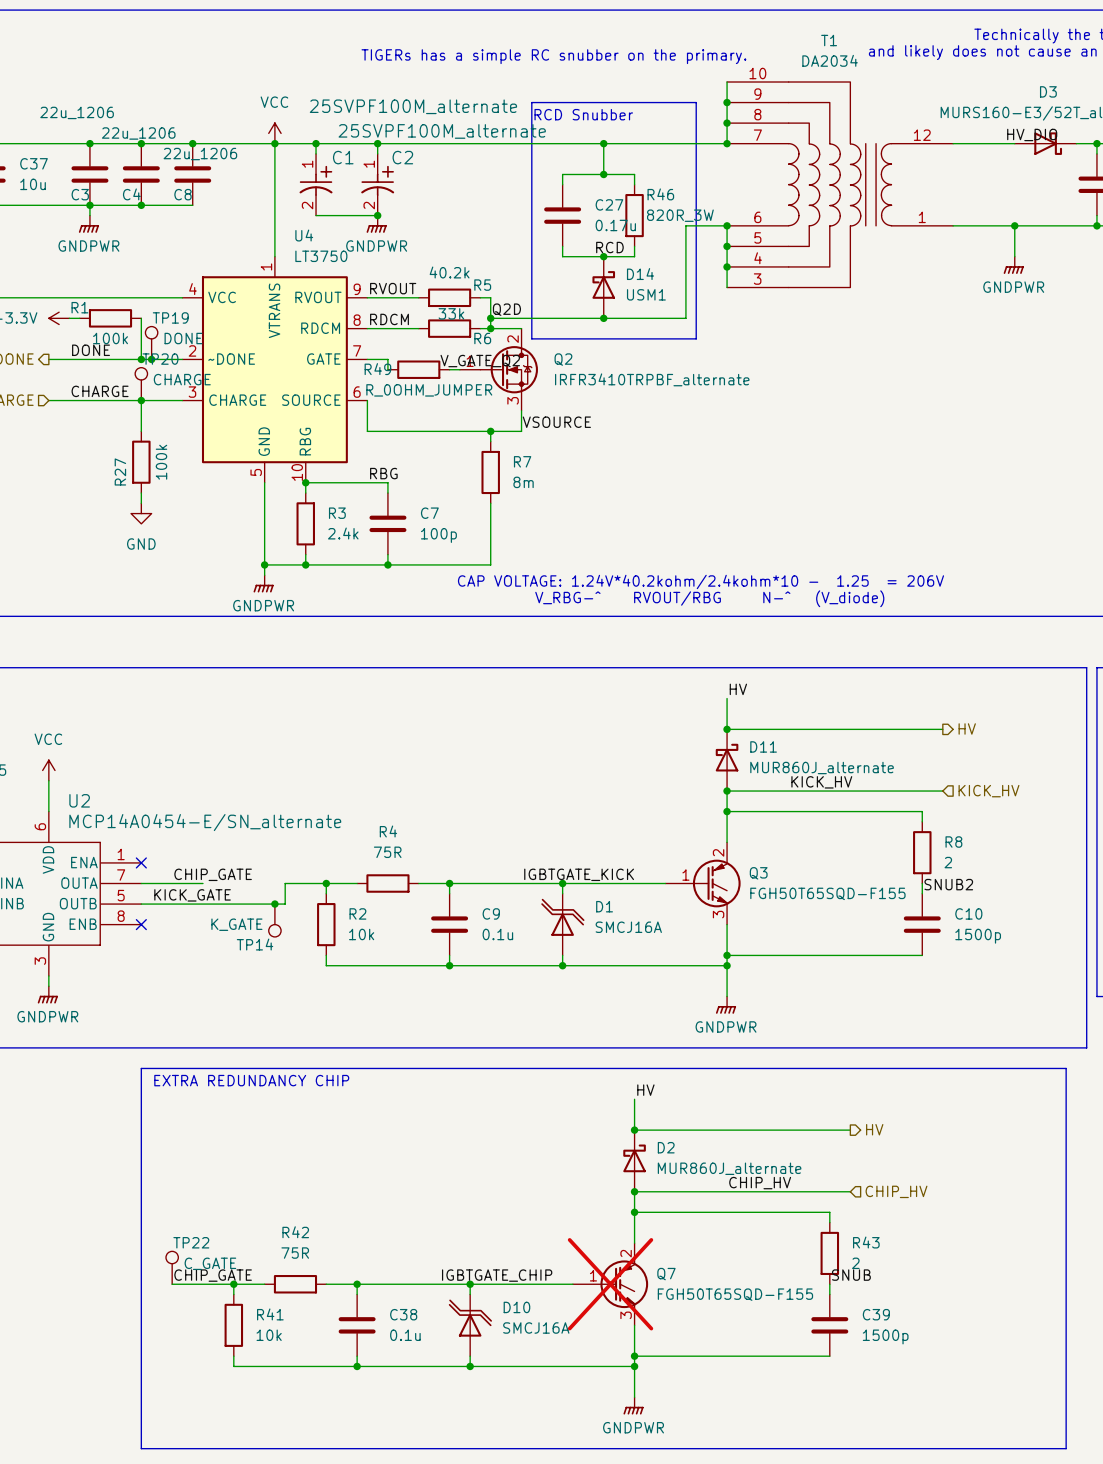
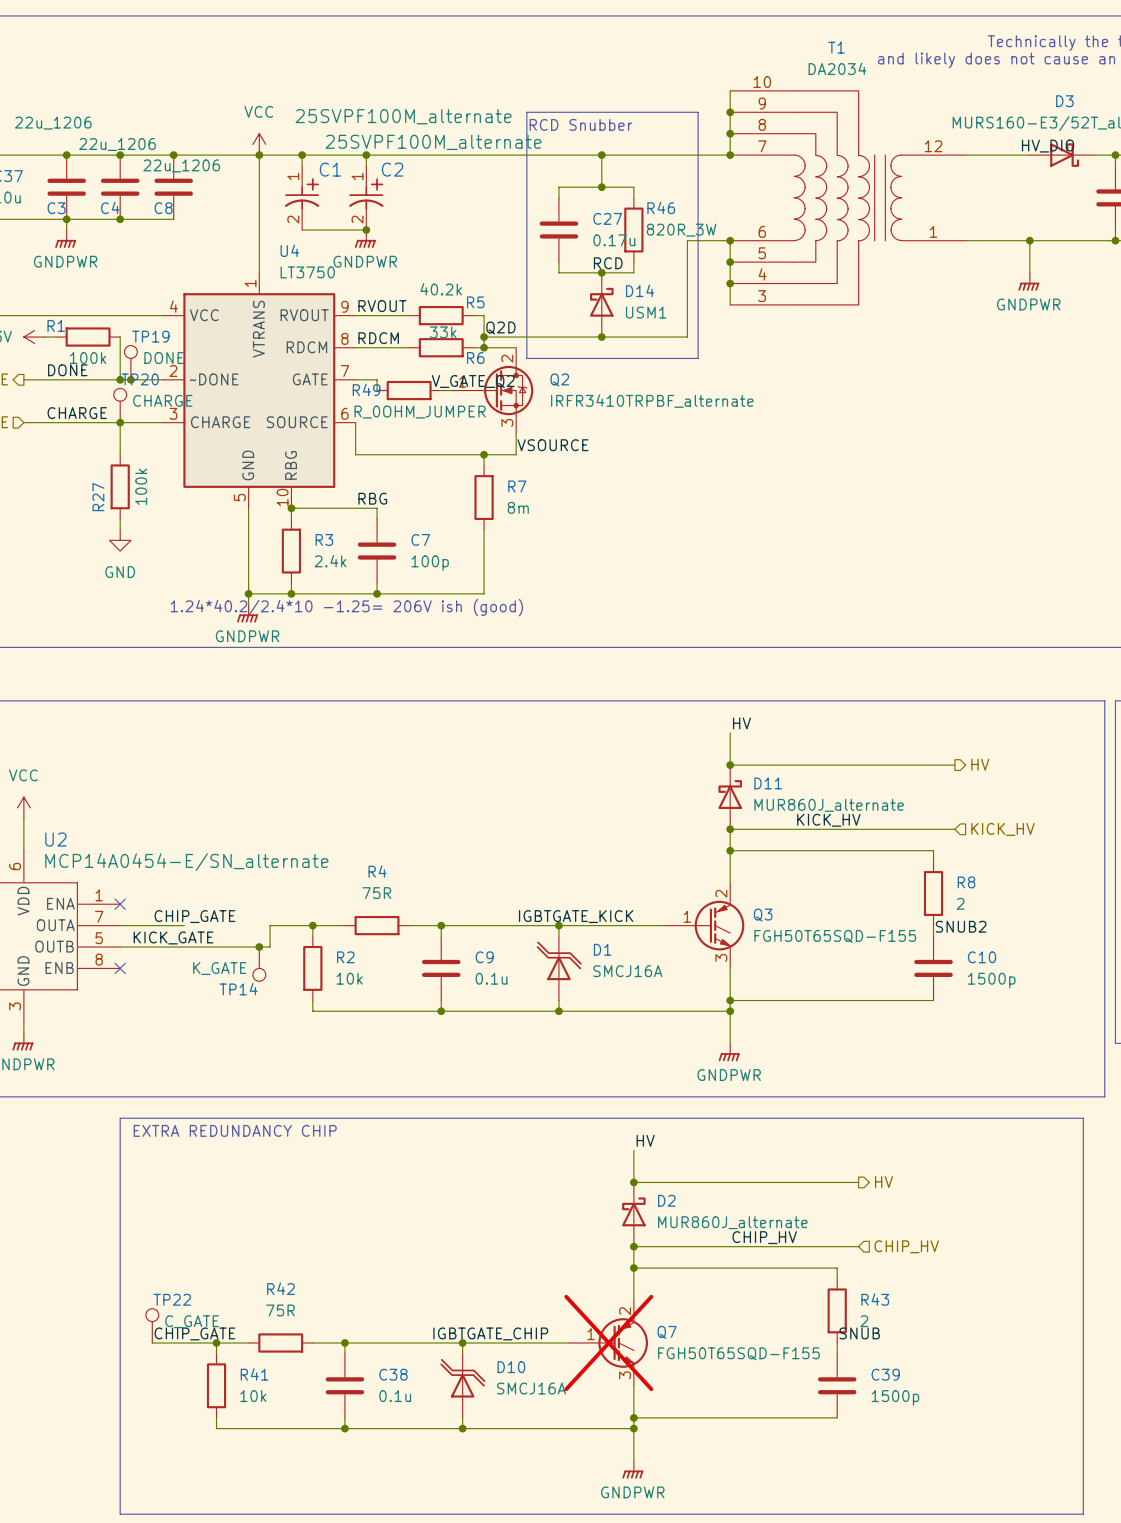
text: TIGERs has a simple RC snubber on the primary. (553, 56) -> none
text: CAP VOLTAGE: 1.24V*40.2kohm/2.4kohm*10 - 1.25 = 206V (700, 581) -> 1.24*40.2/2.4*10 -1.25= 206V ish (good) (346, 607)
text: V_RBG-^ RVOUT/RBG N-^ (V_diode) (709, 598) -> none

